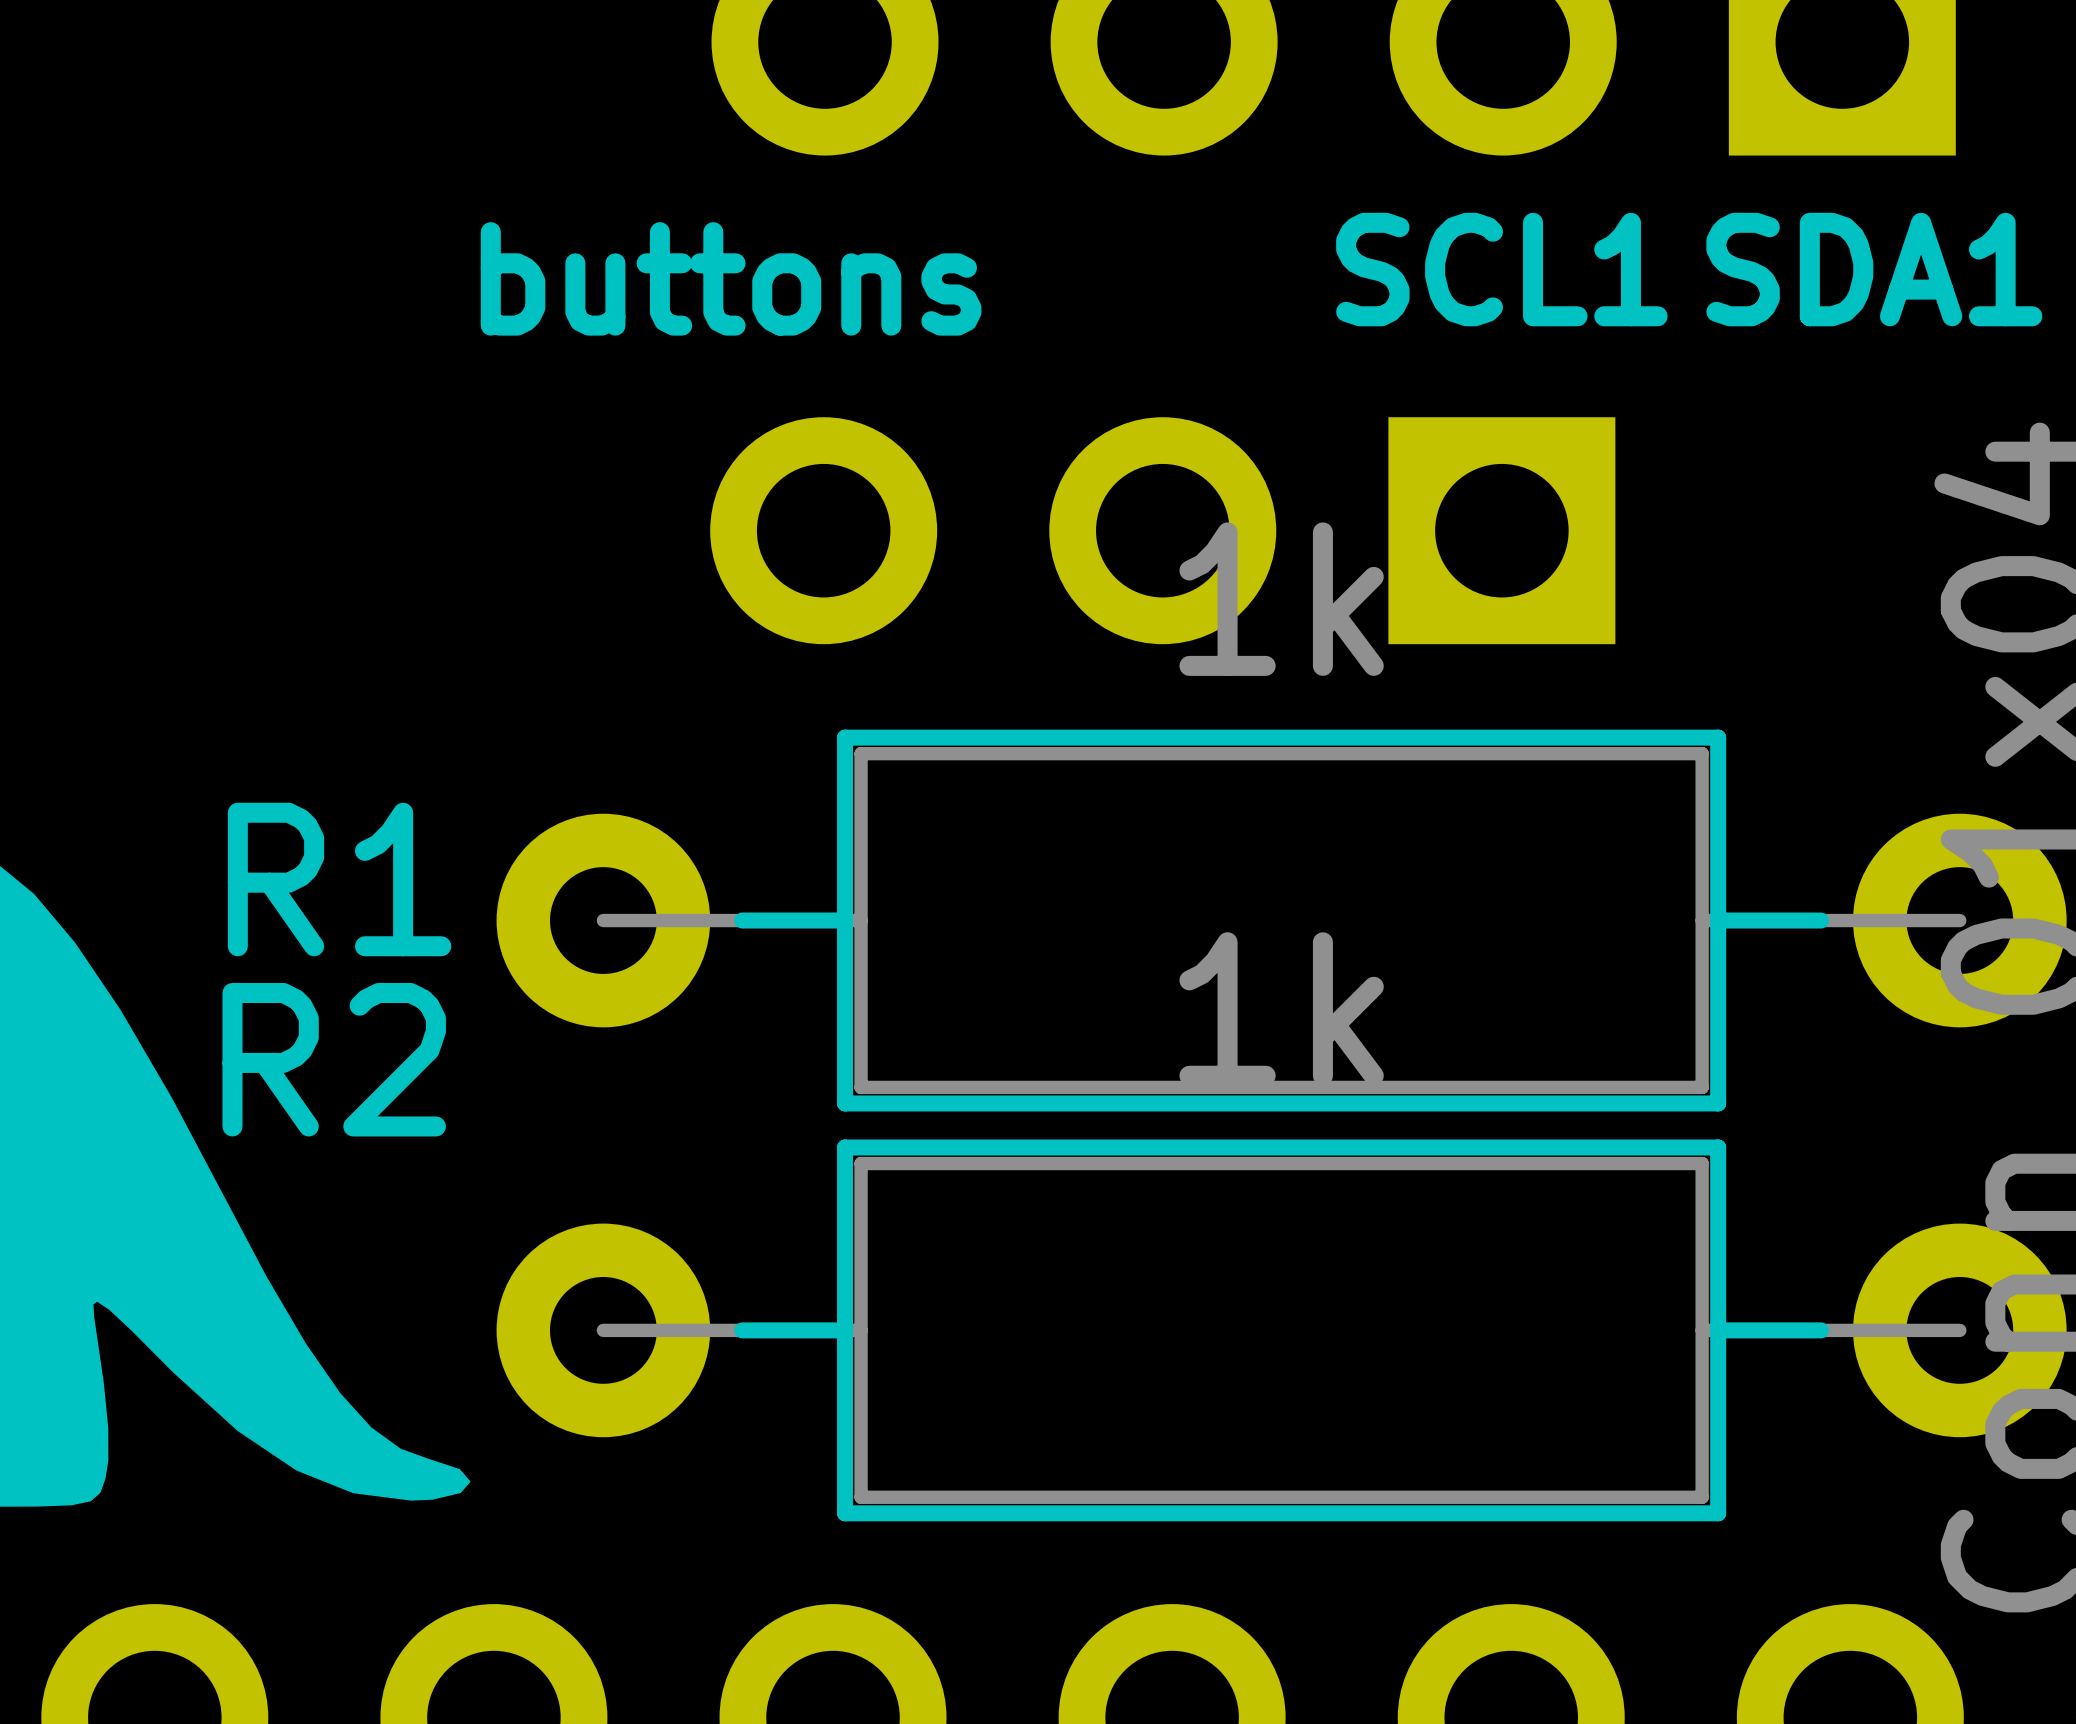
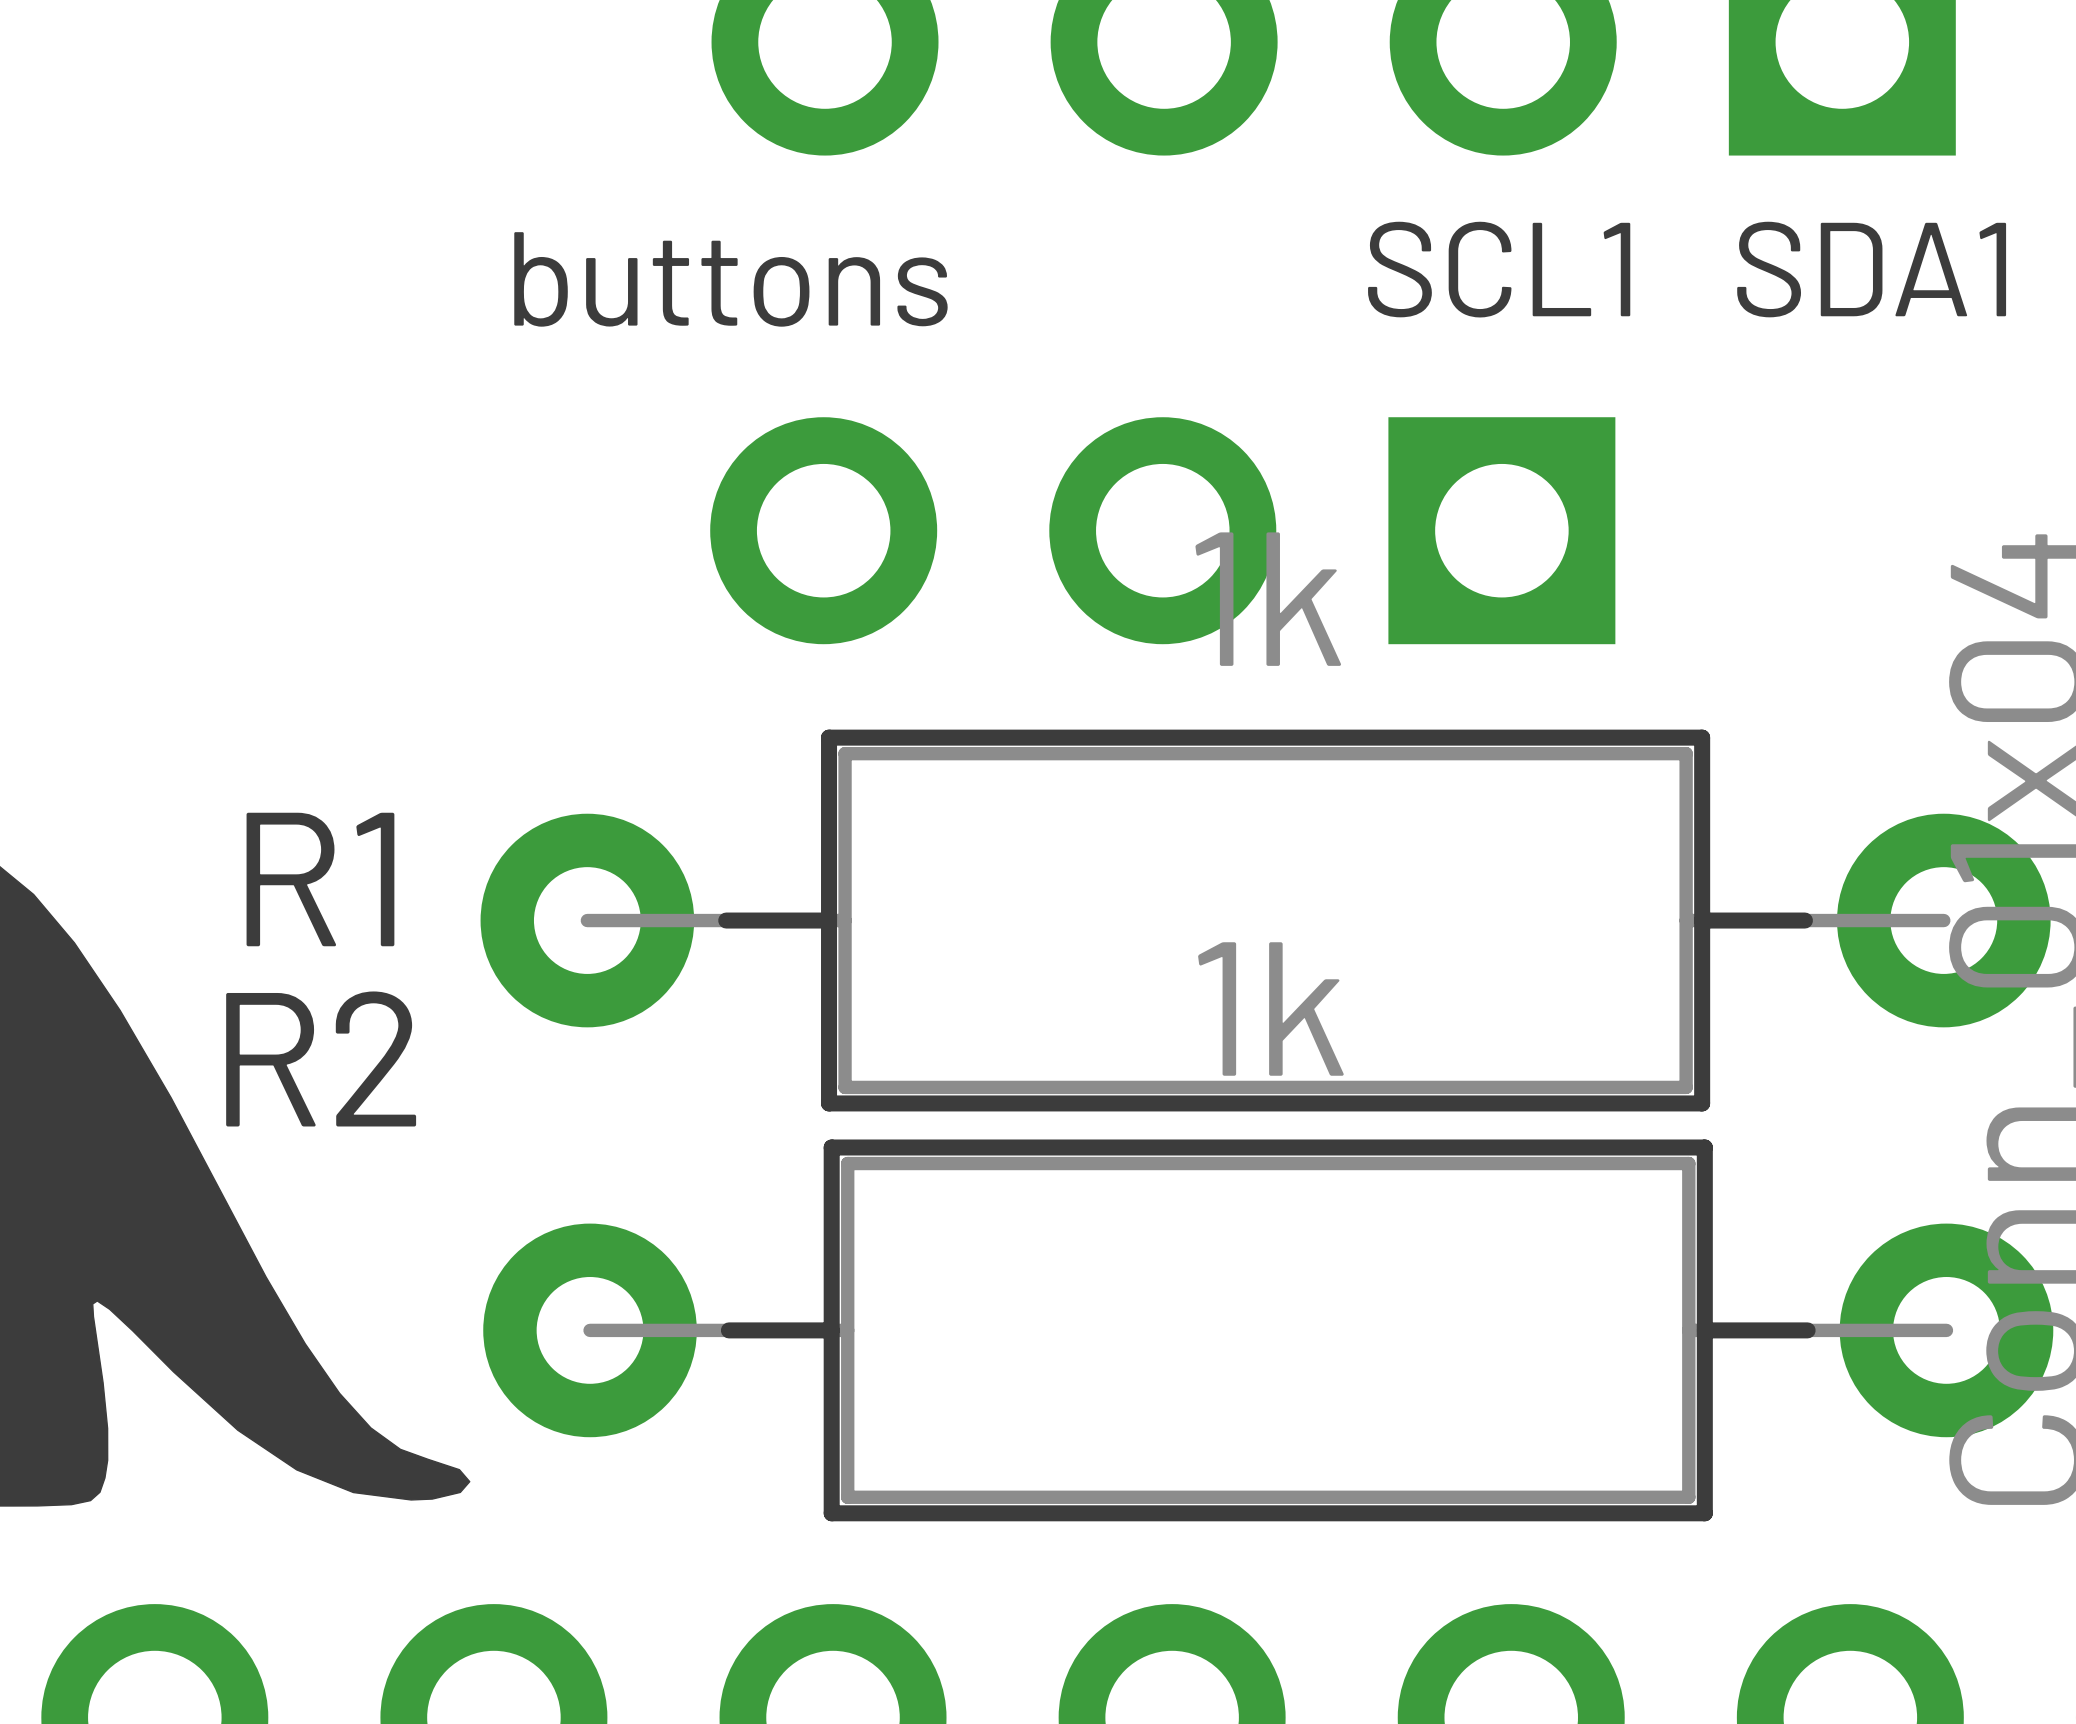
R1 position: (1281, 920) -> (1265, 920)
R2 position: (1281, 1330) -> (1268, 1330)

